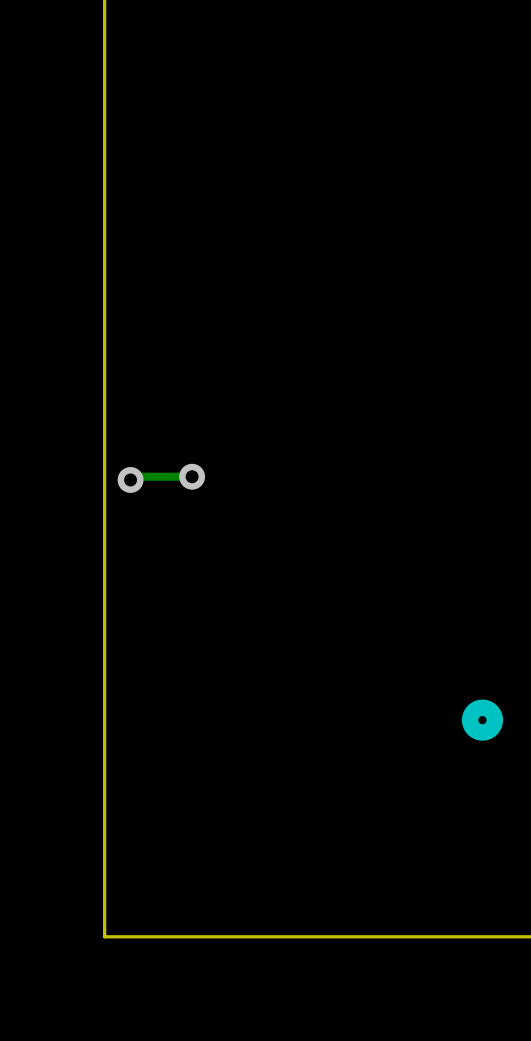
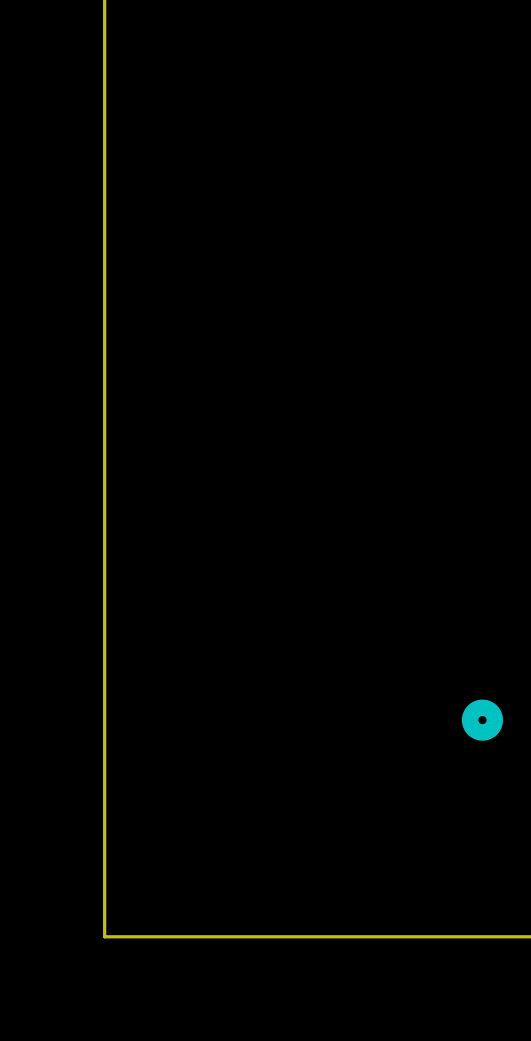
track: (192, 476) (133, 476) (130, 479) -> none
via: (192, 476) -> none
via: (130, 479) -> none

